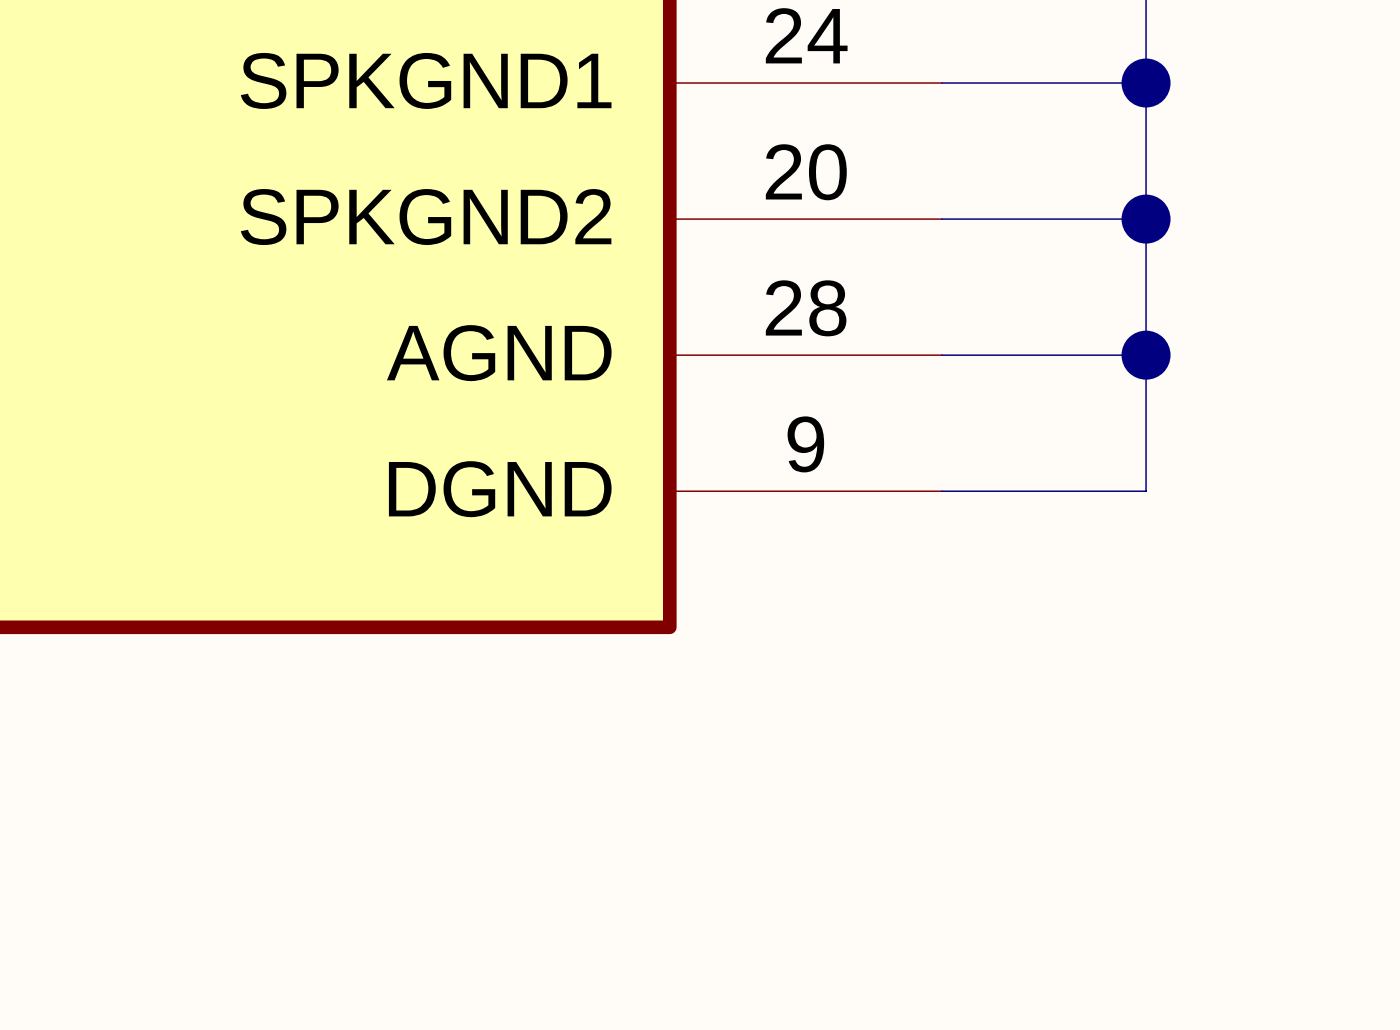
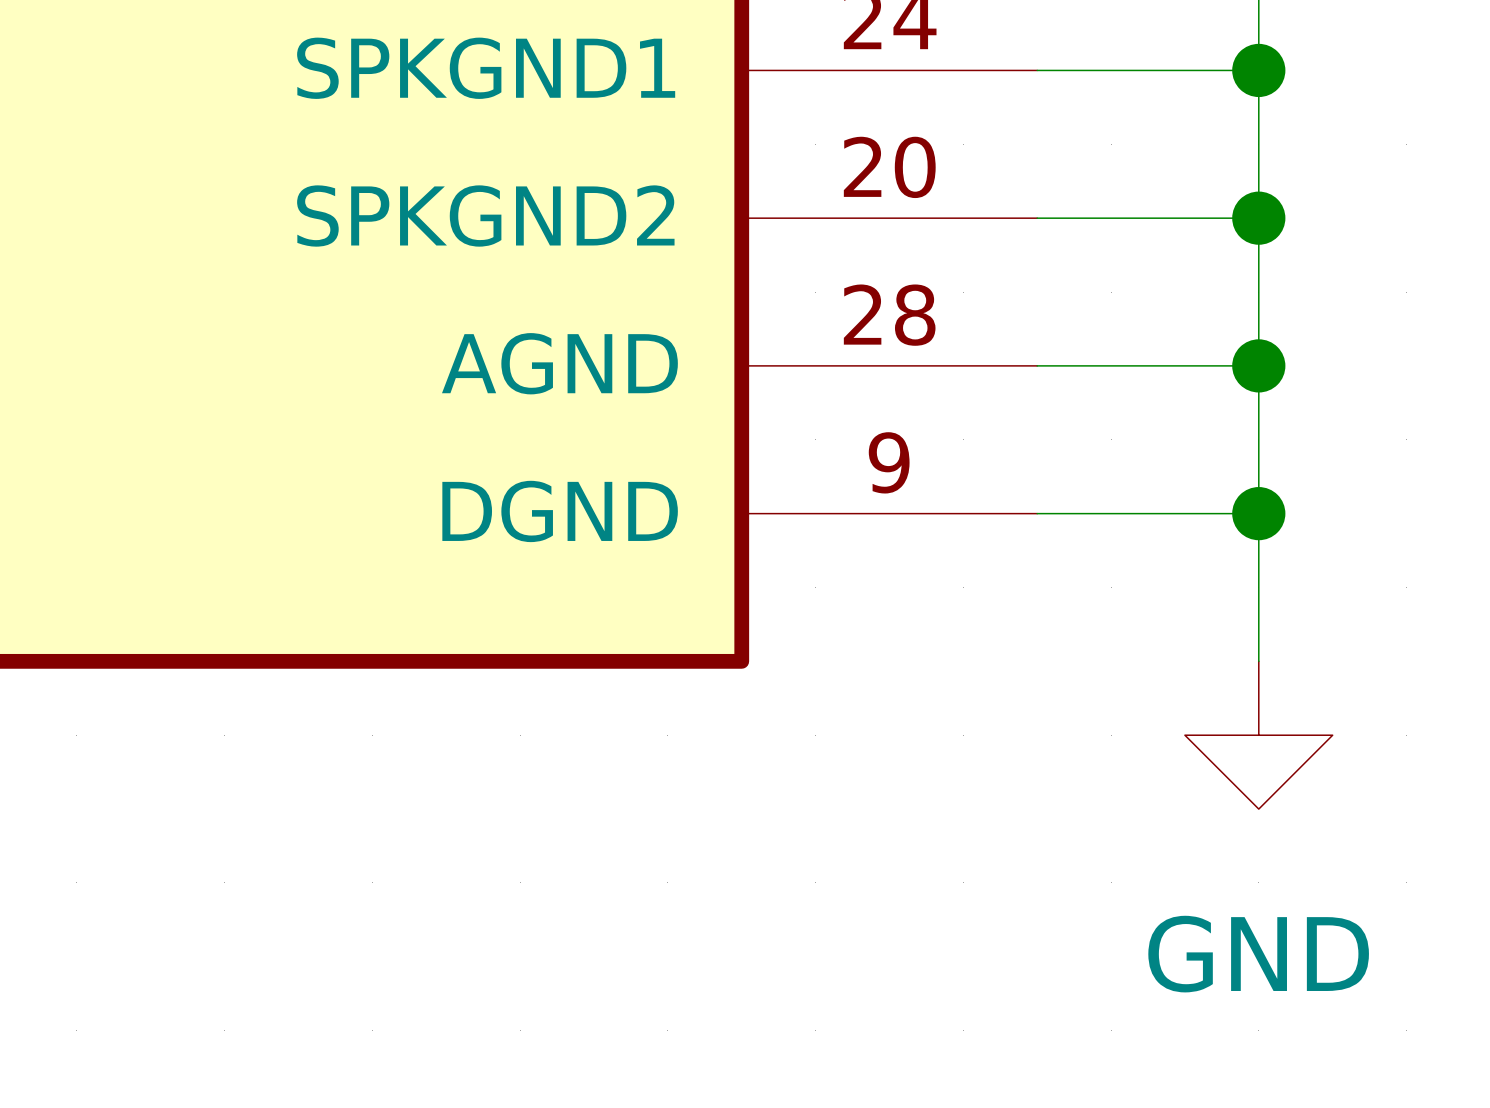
wire: none -> (1258, 513) (1258, 661)
junction: none -> (1258, 513)
power symbol: none -> GND (1258, 735)

